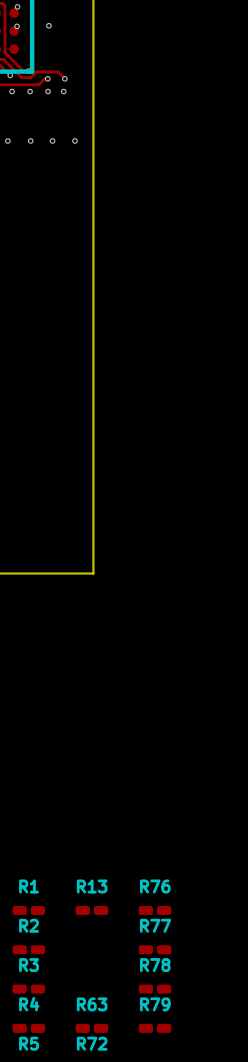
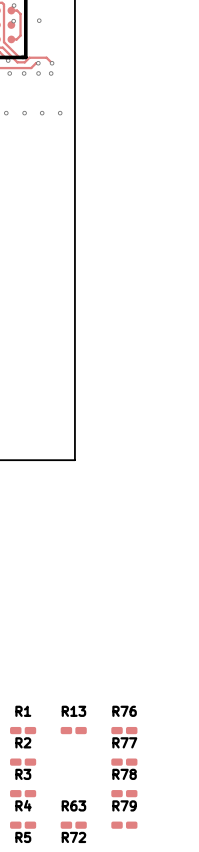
track: none -> (11, 10) (17, 10) (20, 14) (20, 35) (16, 39) (11, 39)

